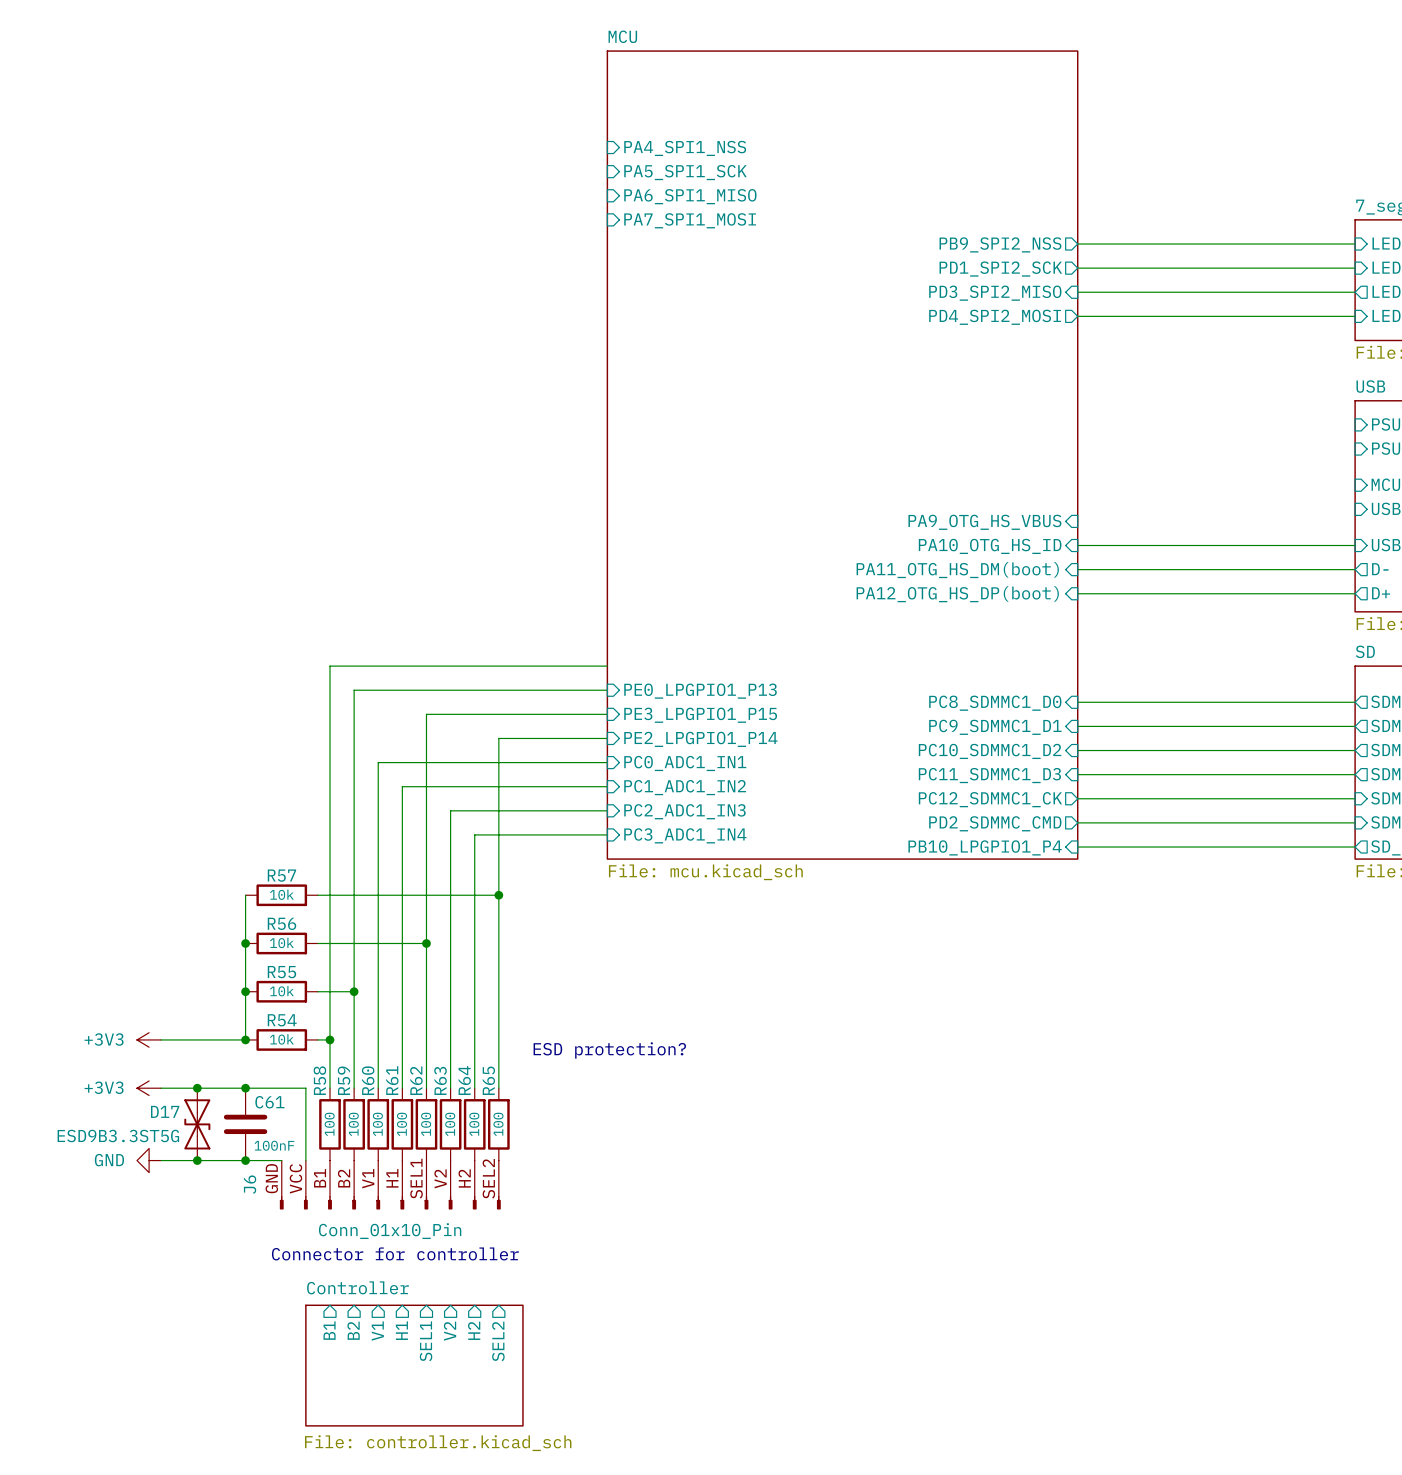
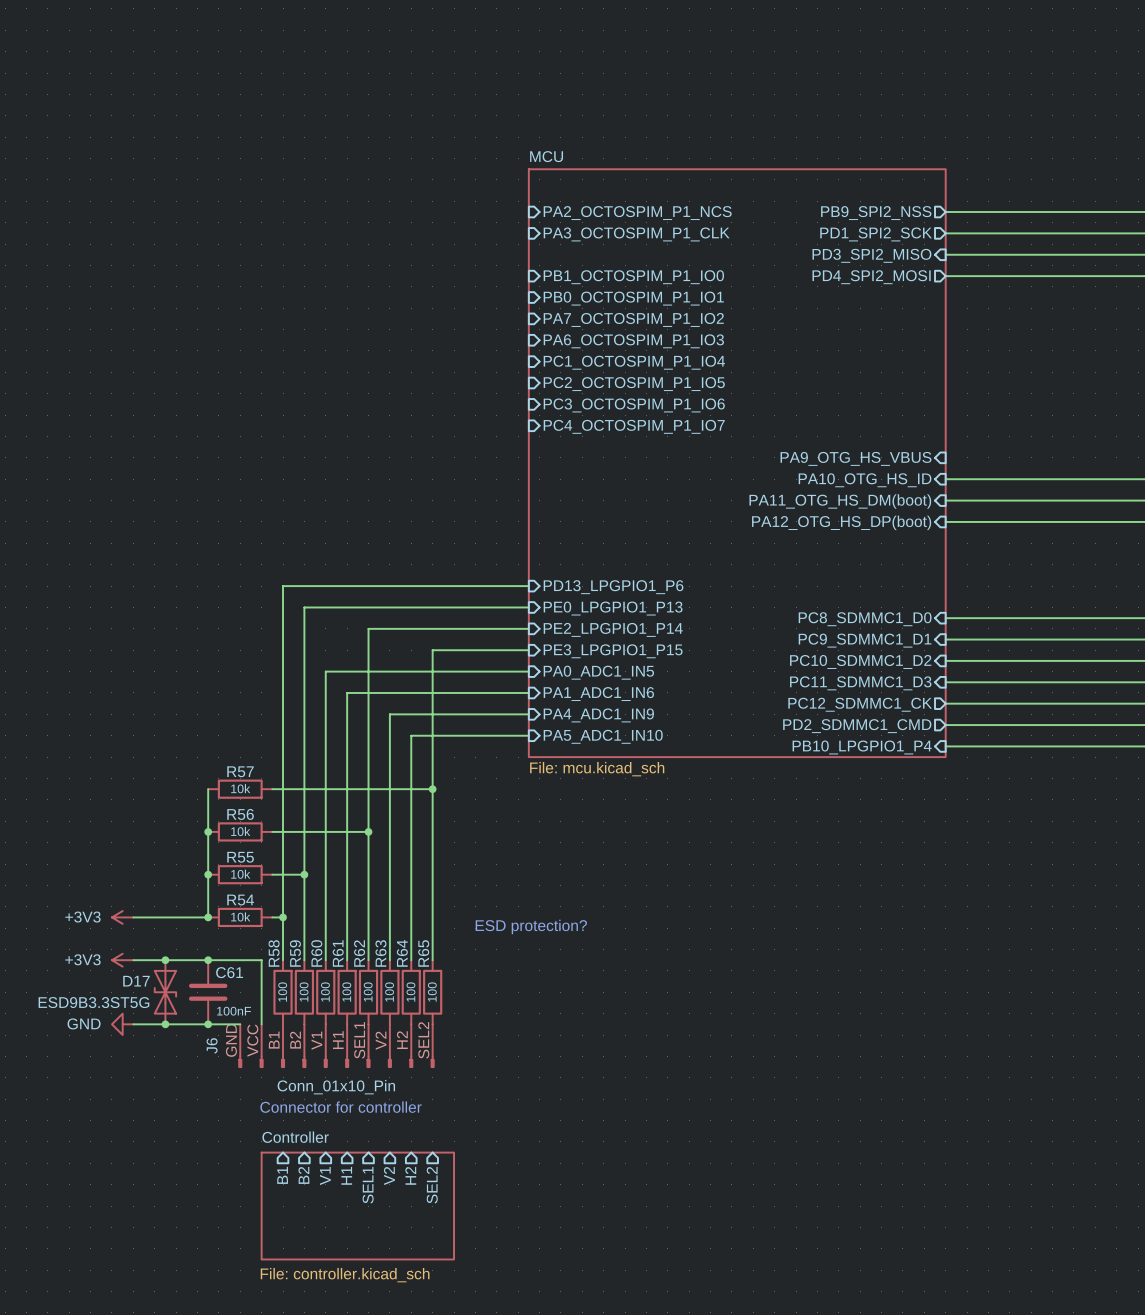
sheet pin: PA4_SPI1_NSS (685, 148) -> none
sheet pin: PA5_SPI1_SCK (685, 172) -> none
sheet pin: PA6_SPI1_MISO (690, 196) -> none
sheet pin: PA7_SPI1_MOSI (690, 220) -> none
sheet pin: none -> PA2_OCTOSPIM_P1_NCS (637, 213)
sheet pin: none -> PA3_OCTOSPIM_P1_CLK (636, 234)
sheet pin: none -> PB1_OCTOSPIM_P1_IO0 (633, 277)
sheet pin: none -> PB0_OCTOSPIM_P1_IO1 (633, 298)
sheet pin: none -> PA7_OCTOSPIM_P1_IO2 (633, 319)
sheet pin: none -> PA6_OCTOSPIM_P1_IO3 (633, 341)
sheet pin: none -> PC1_OCTOSPIM_P1_IO4 (634, 362)
sheet pin: none -> PC2_OCTOSPIM_P1_IO5 (634, 384)
sheet MCU: File: mcu.kicad_sch (842, 455) -> none
sheet pin: none -> PC3_OCTOSPIM_P1_IO6 (634, 405)
sheet pin: none -> PC4_OCTOSPIM_P1_IO7 (634, 426)
sheet MCU: none -> File: mcu.kicad_sch (737, 463)
sheet pin: none -> PD13_LPGPIO1_P6 (613, 587)
sheet pin: PE3_LPGPIO1_P15 (700, 715) -> PE2_LPGPIO1_P14 (613, 629)
sheet pin: PE2_LPGPIO1_P14 (700, 739) -> PE3_LPGPIO1_P15 (613, 651)
sheet pin: PC0_ADC1_IN1 (685, 763) -> PA0_ADC1_IN5 (598, 672)
sheet pin: PC1_ADC1_IN2 (685, 787) -> PA1_ADC1_IN6 (598, 694)
sheet pin: PC2_ADC1_IN3 (684, 811) -> PA4_ADC1_IN9 (598, 715)
sheet pin: PD2_SDMMC_CMD (995, 823) -> PD2_SDMMC1_CMD (857, 726)
sheet pin: PC3_ADC1_IN4 (685, 835) -> PA5_ADC1_IN10 (603, 736)

